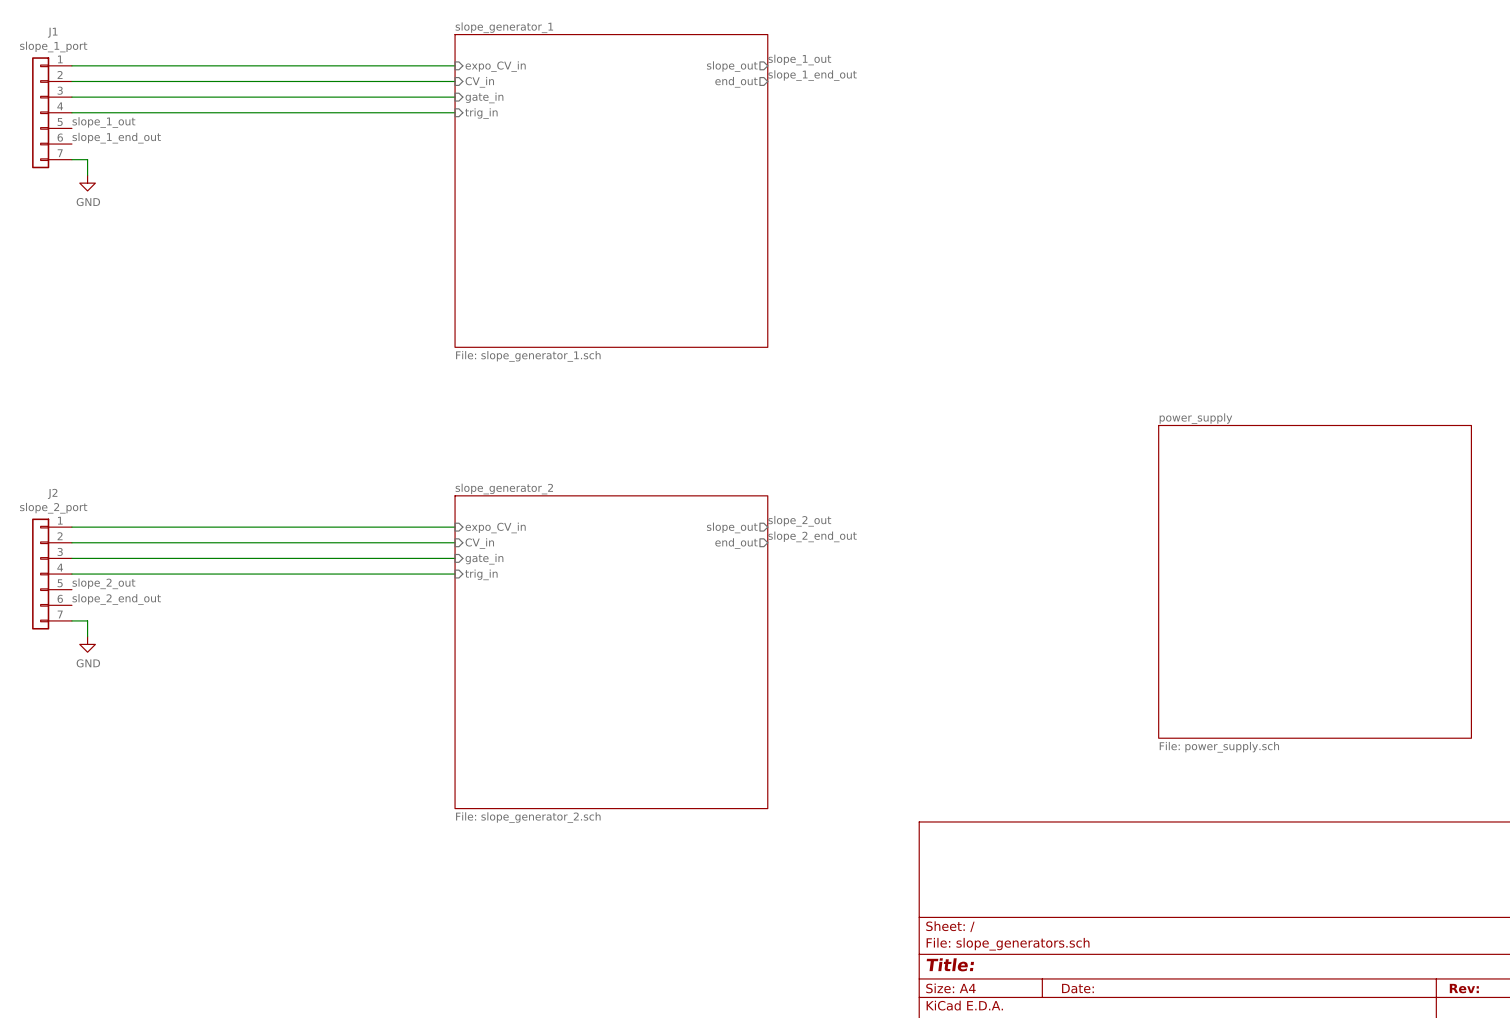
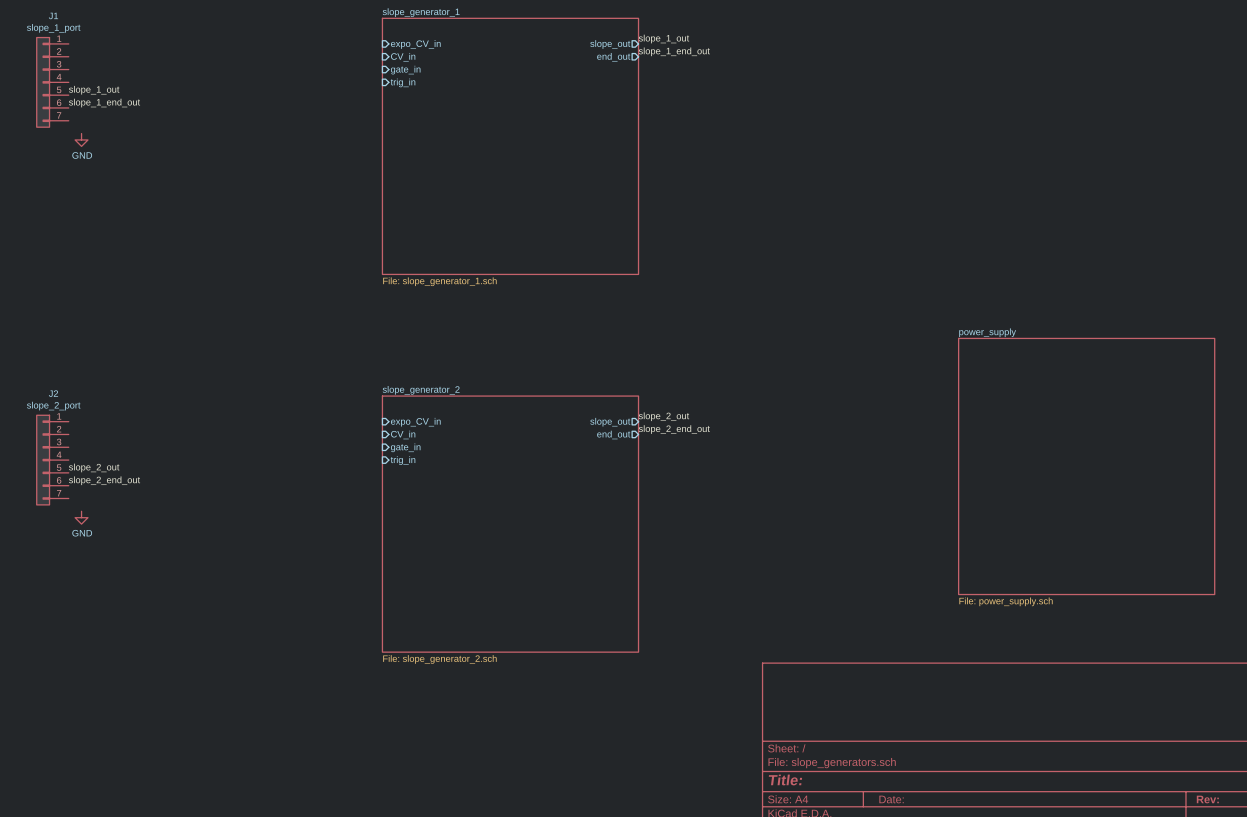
wire: (71, 65) (455, 65) -> none
wire: (71, 81) (455, 81) -> none
wire: (71, 97) (455, 97) -> none
wire: (71, 112) (455, 112) -> none
wire: (71, 159) (87, 159) (87, 175) -> none
wire: (71, 527) (455, 527) -> none
wire: (71, 542) (455, 542) -> none
wire: (71, 558) (455, 558) -> none
wire: (71, 574) (455, 574) -> none
wire: (71, 620) (87, 620) (87, 636) -> none

